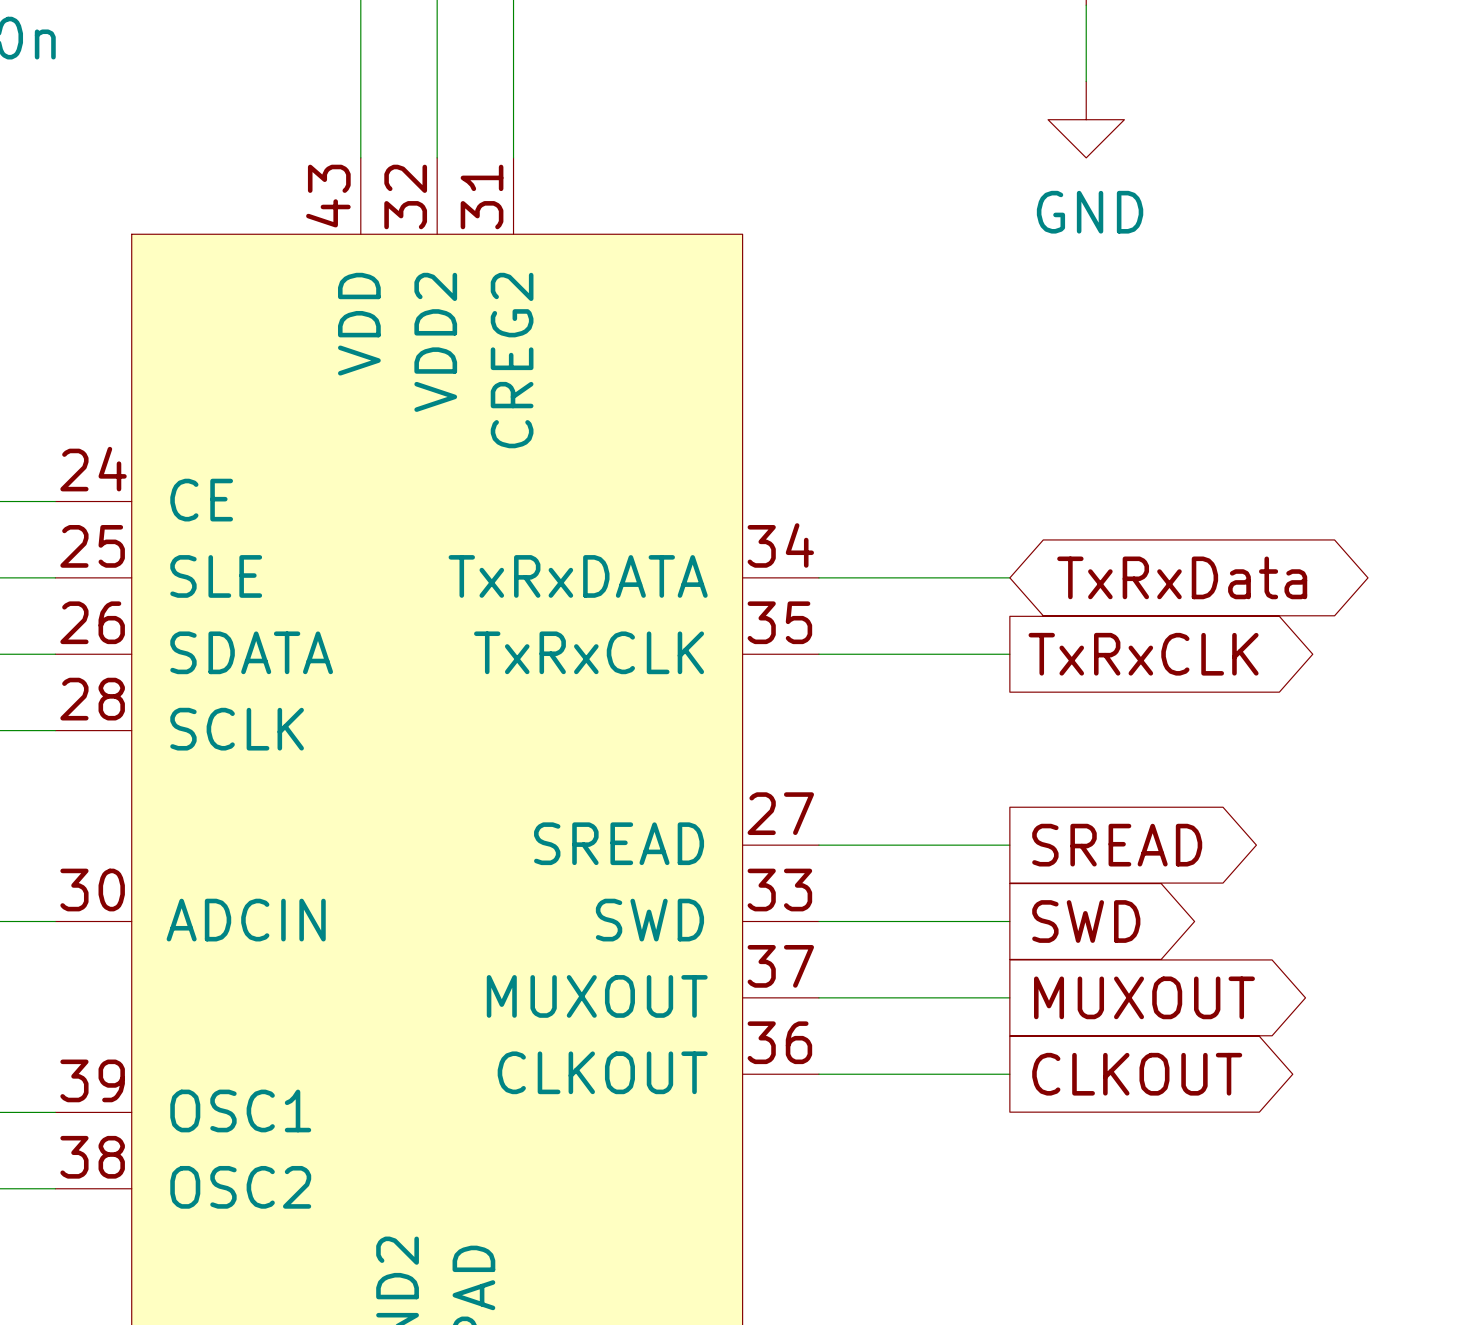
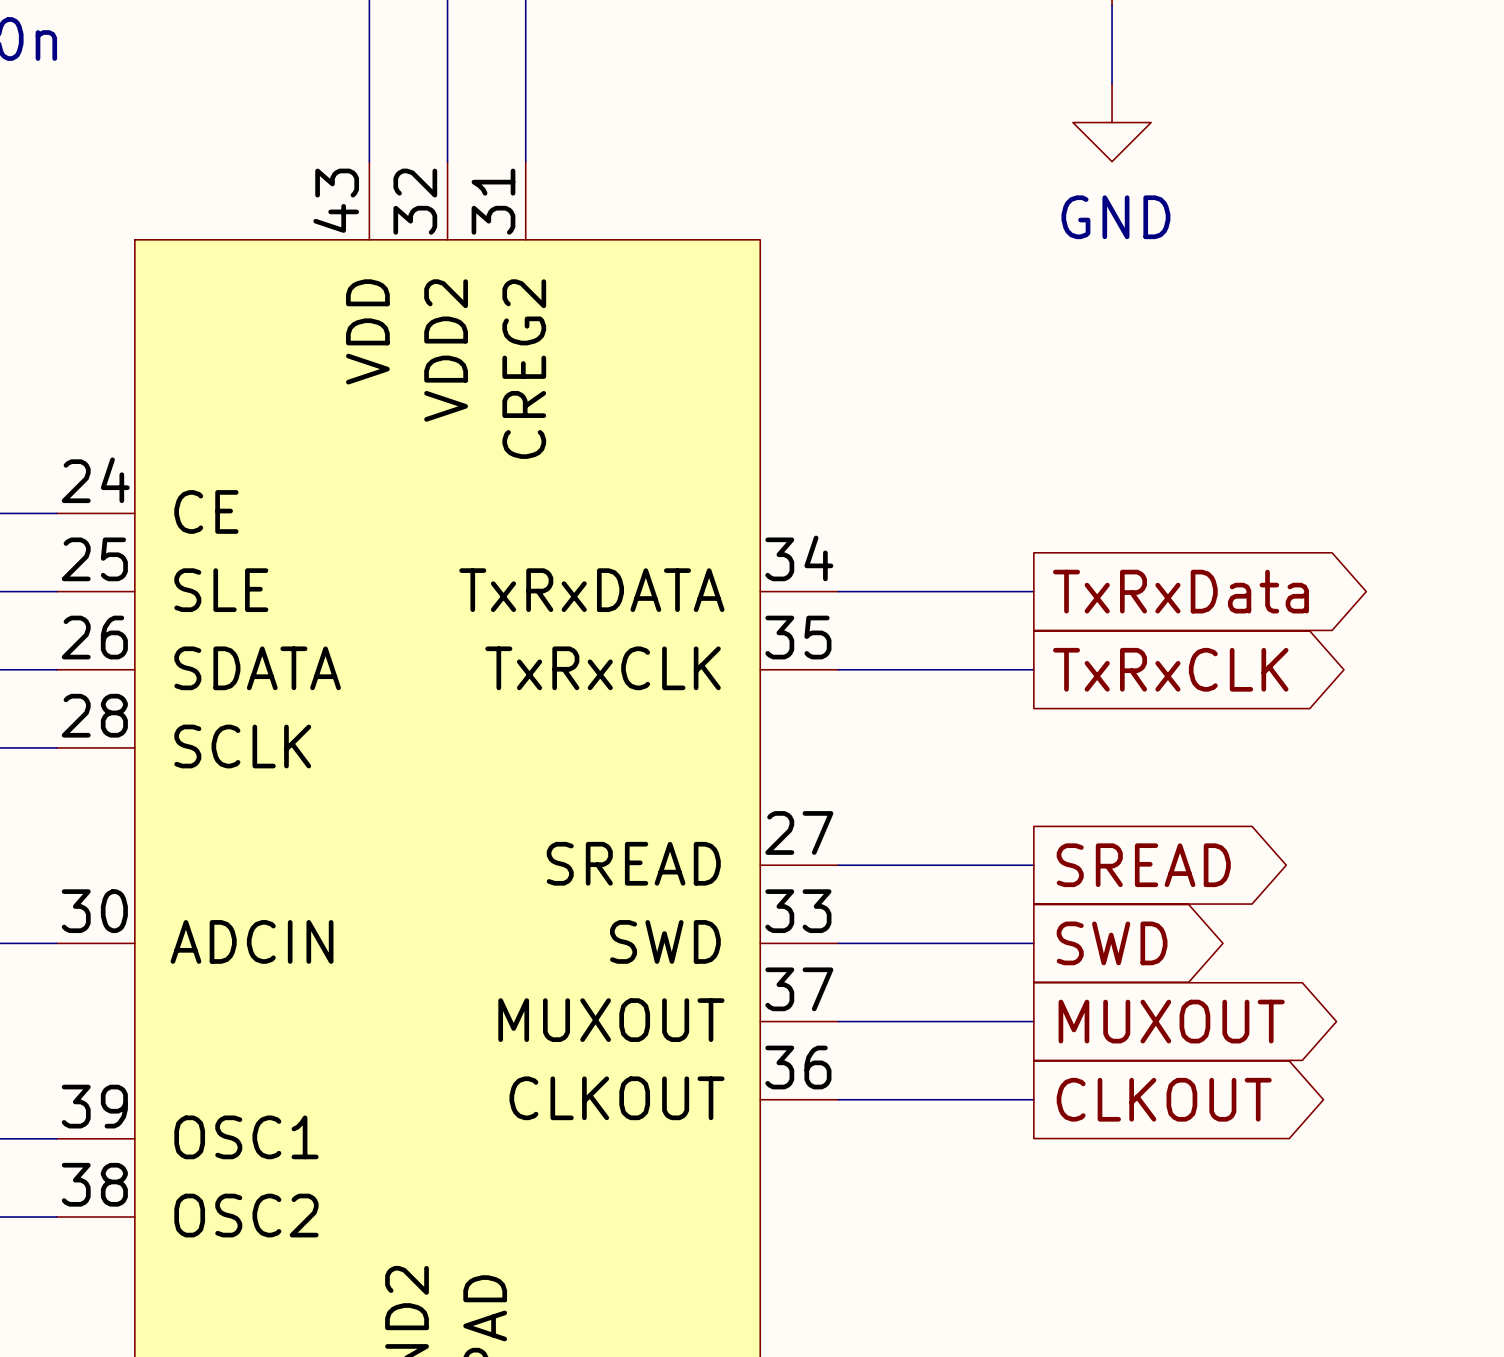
global label shape: bidirectional (1182, 577) -> output (1180, 591)

